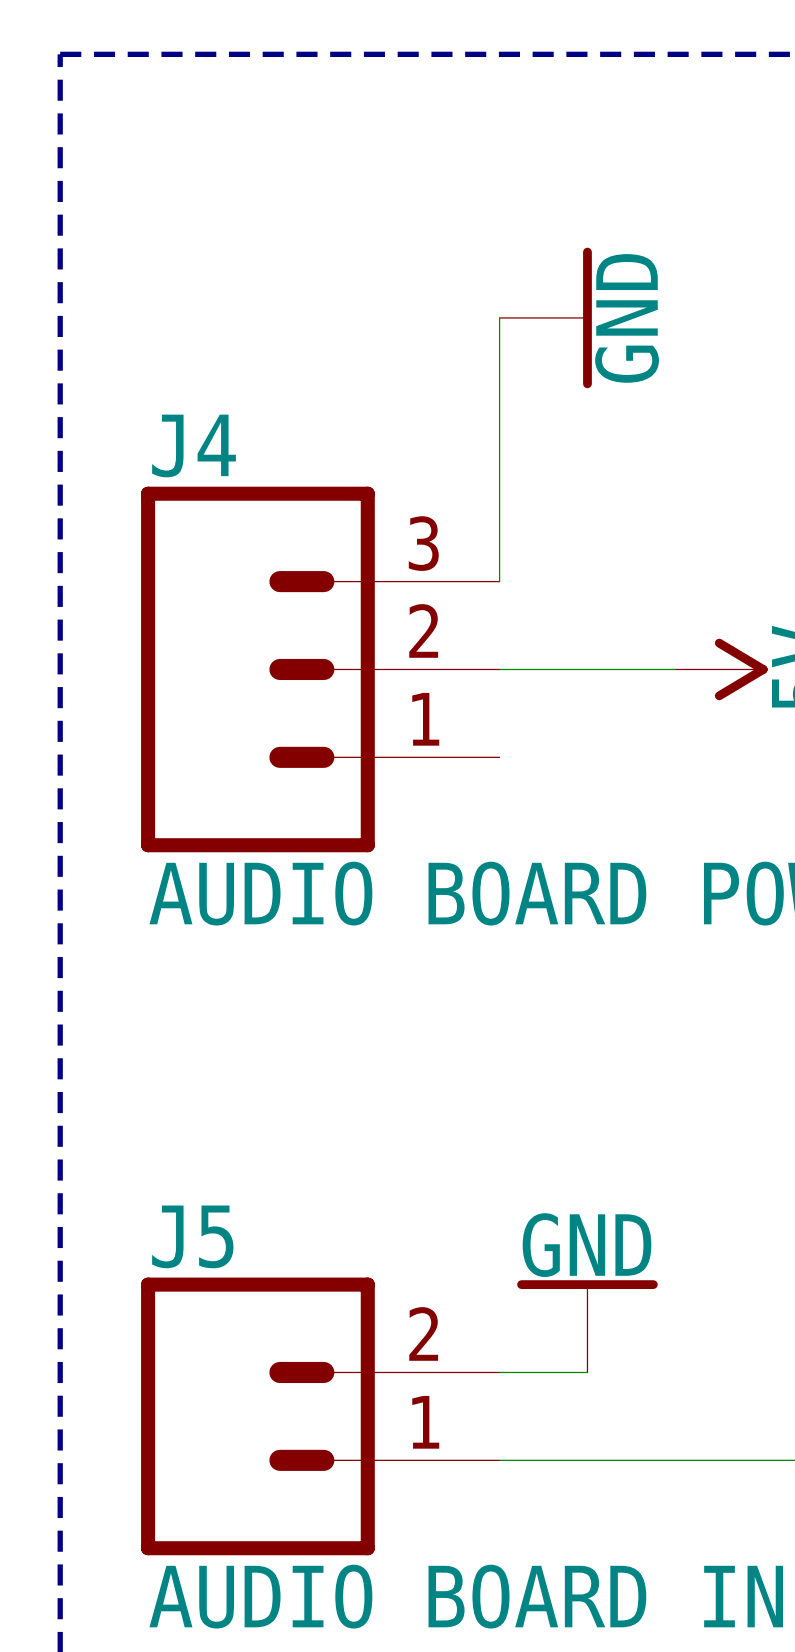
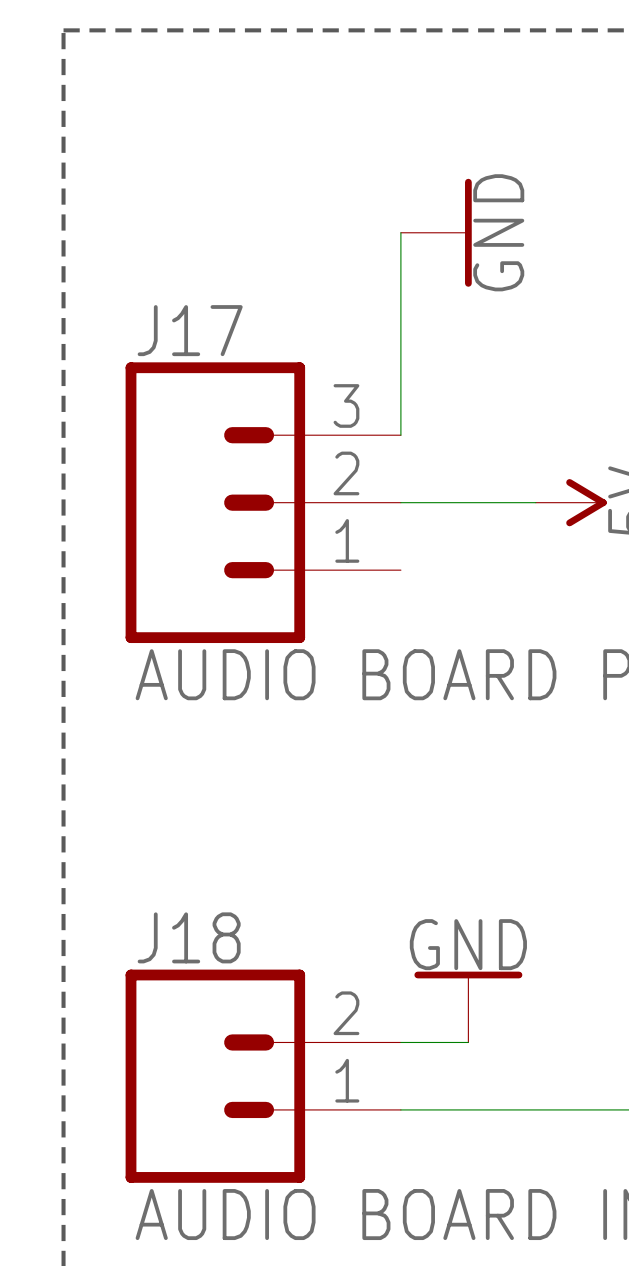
J4 name: J4 (194, 445) -> J17 (190, 330)
J5 name: J5 (192, 1236) -> J18 (189, 937)

